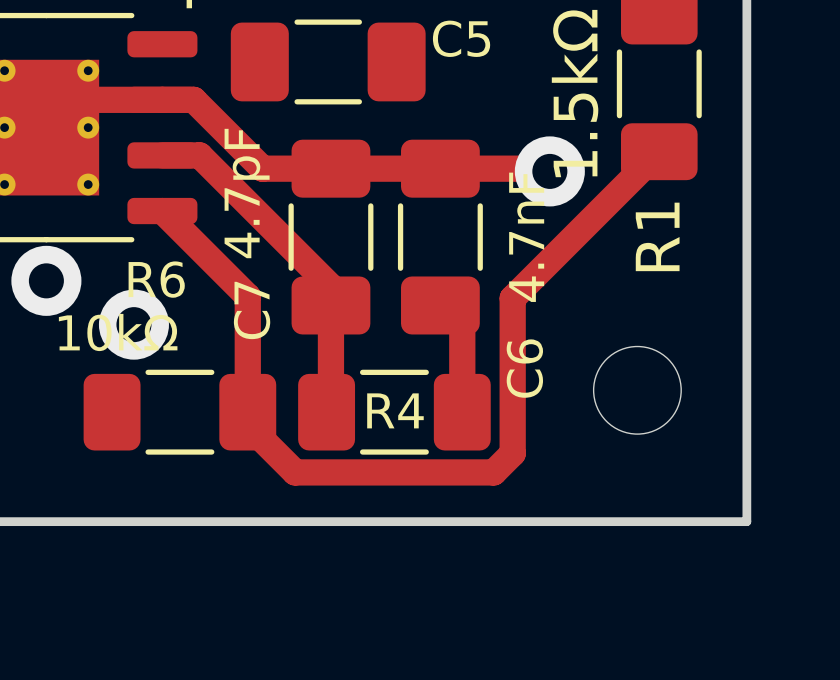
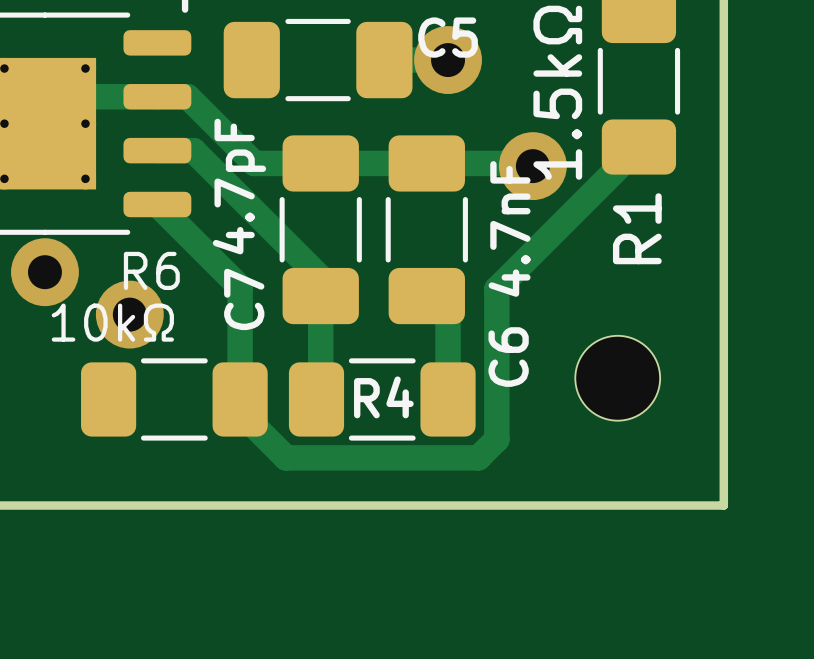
via: none -> (448, 60)

